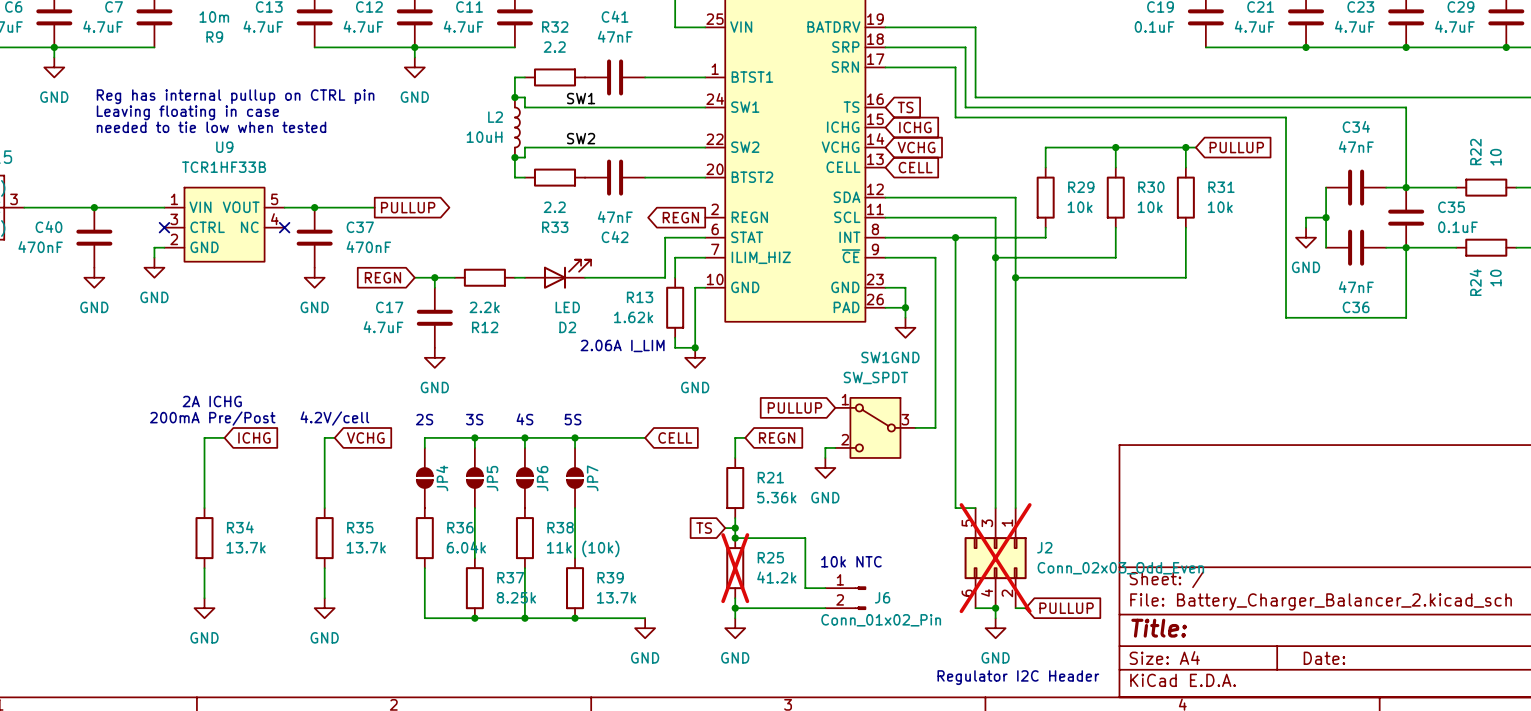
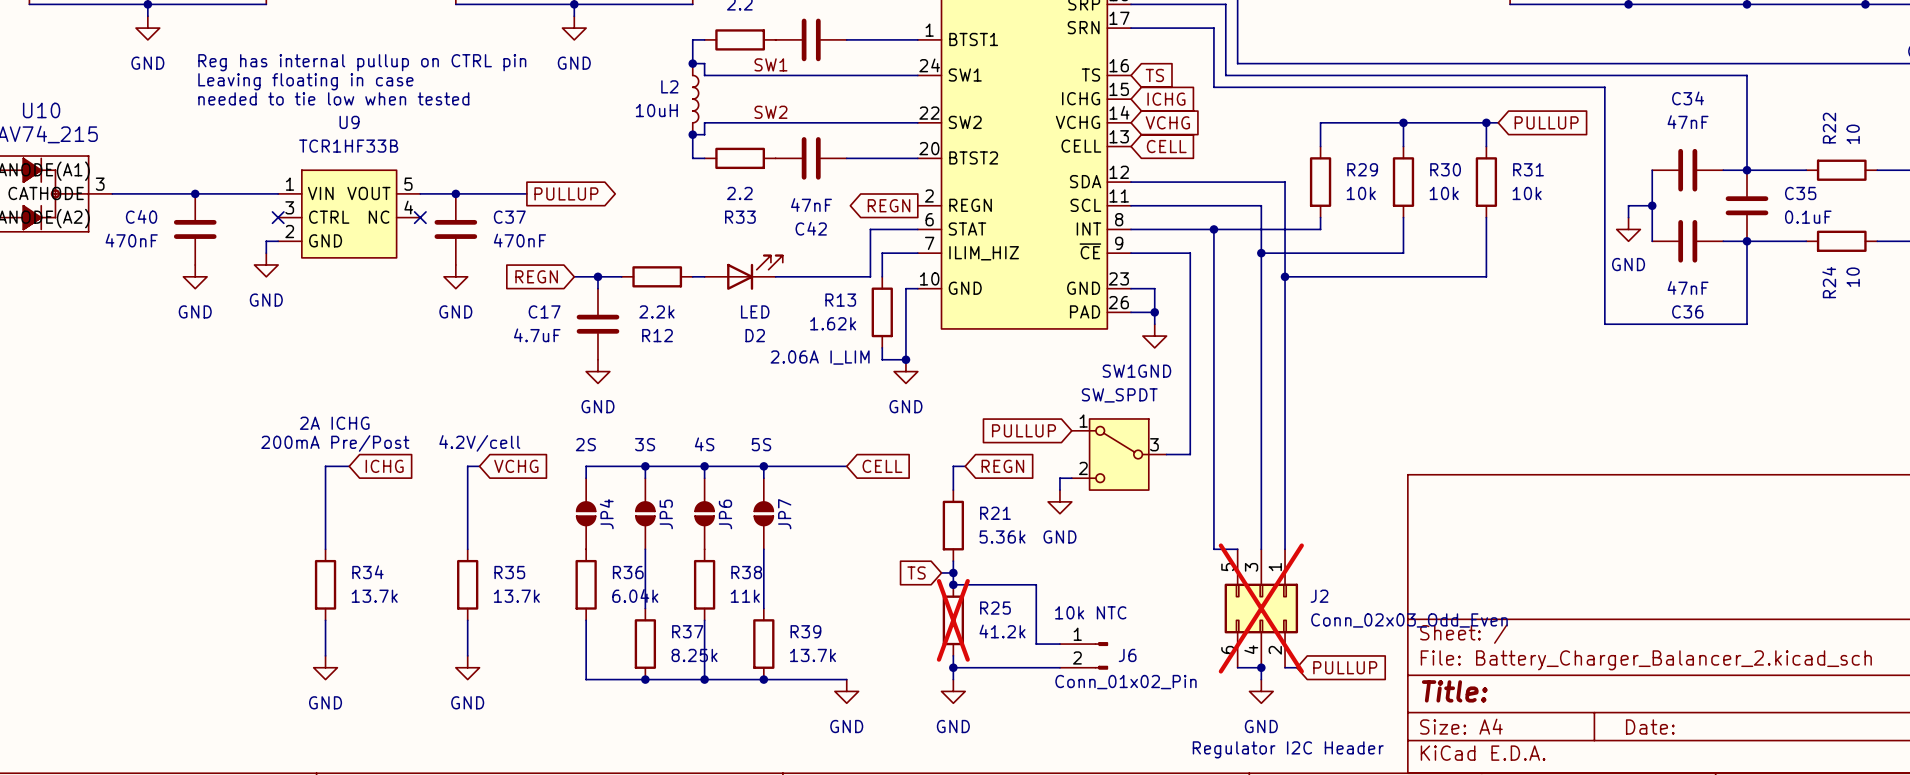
R38 value: 11k (10k) (583, 548) -> 11k (745, 596)

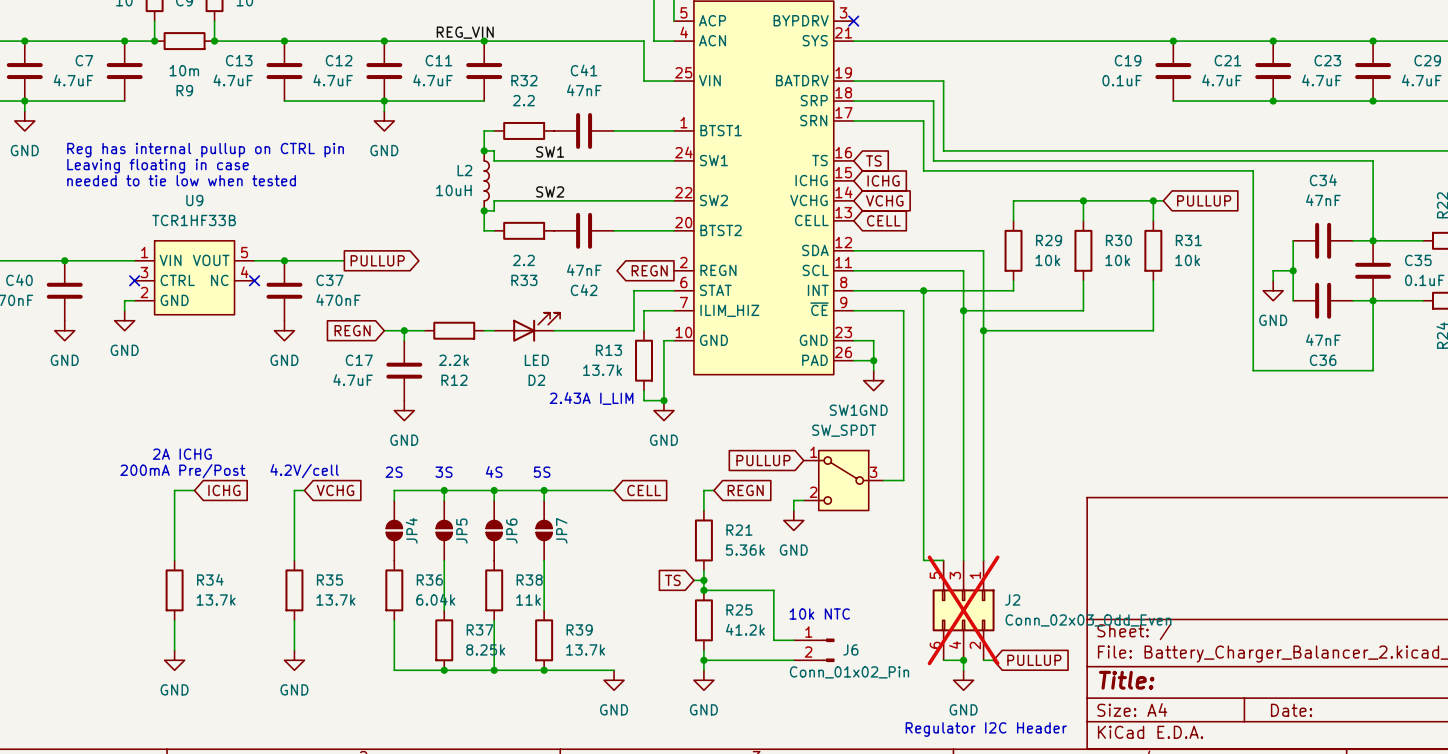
R13 value: 1.62k (833, 323) -> 13.7k (602, 370)
text: 2.06A I_LIM (820, 357) -> 2.43A I_LIM (591, 398)
R25 do-not-place cross: (953, 620) -> none

